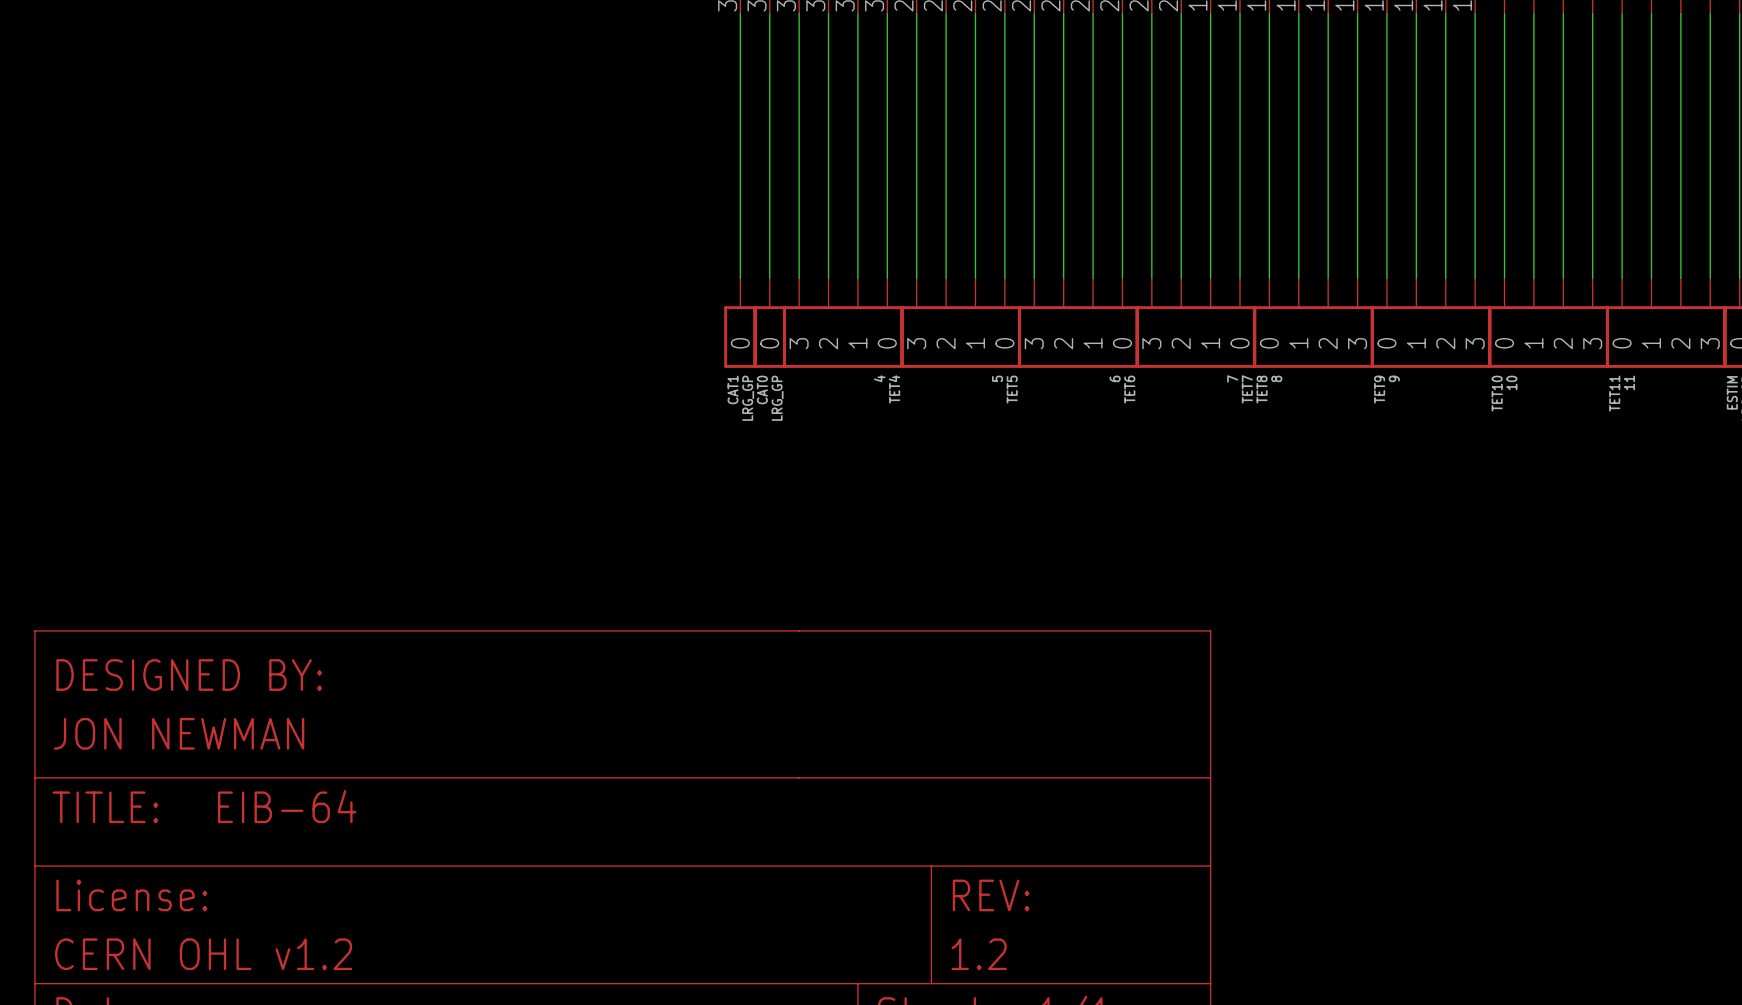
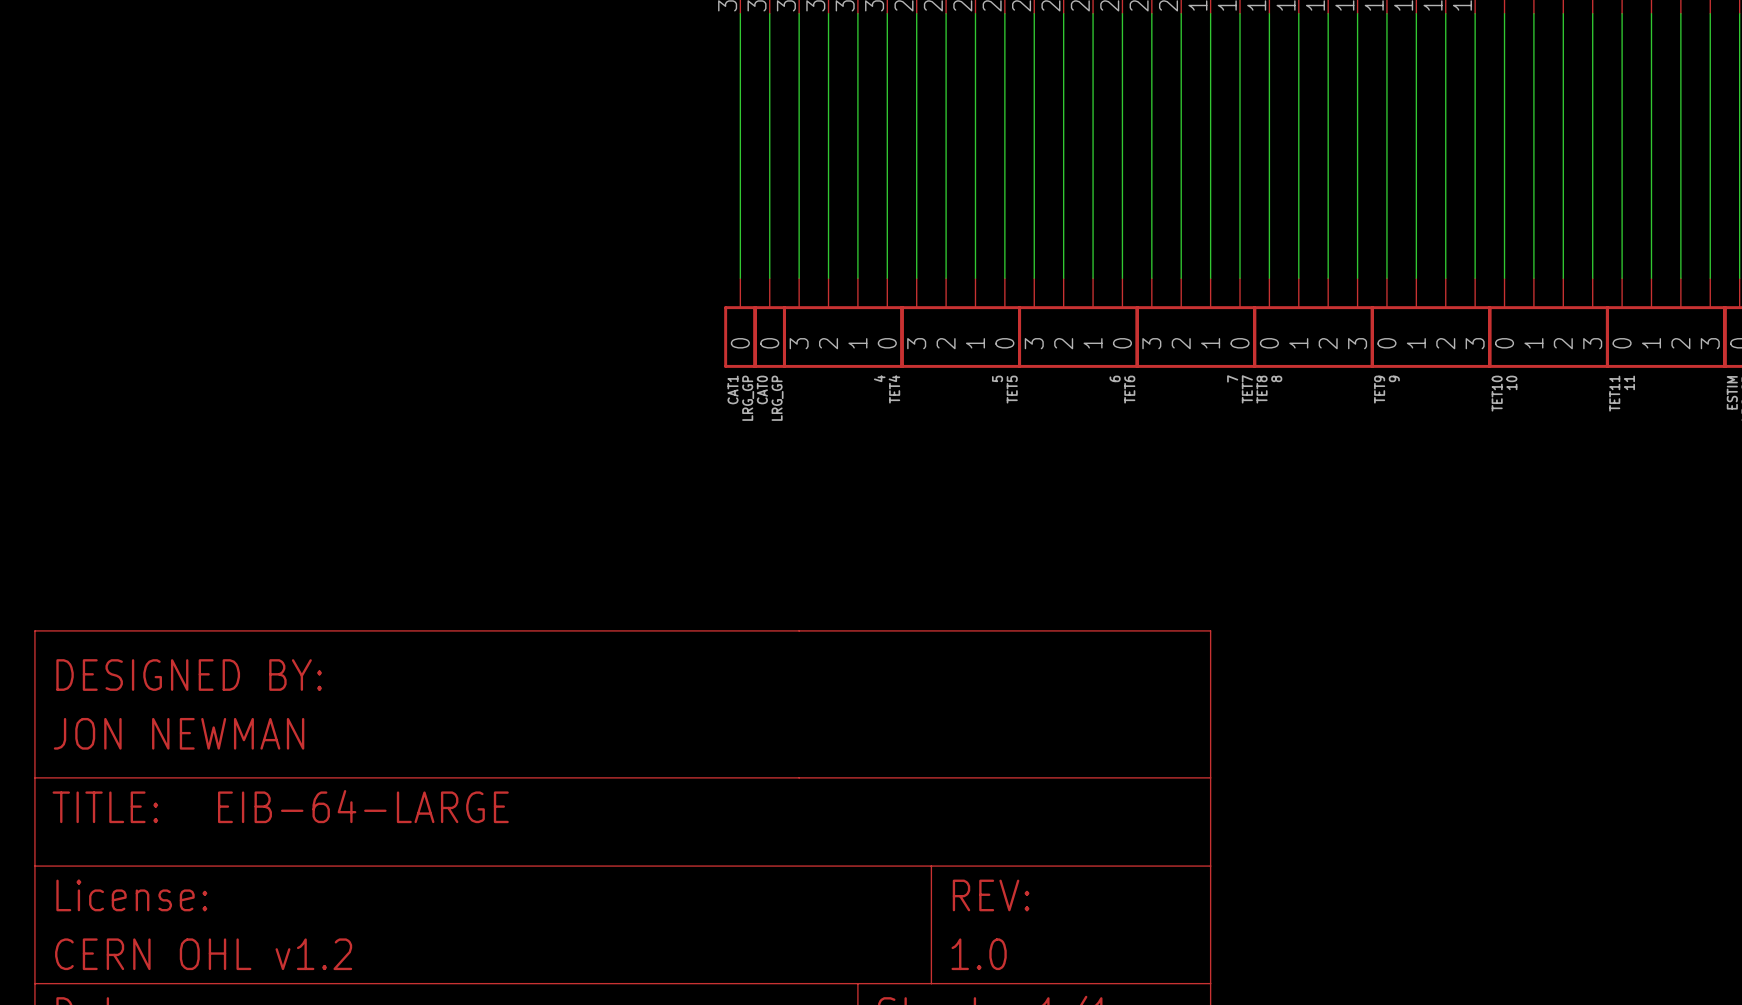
part text: EIB-64 (287, 806) -> EIB-64-LARGE (363, 806)
part text: 1.2 (979, 954) -> 1.0 (979, 954)

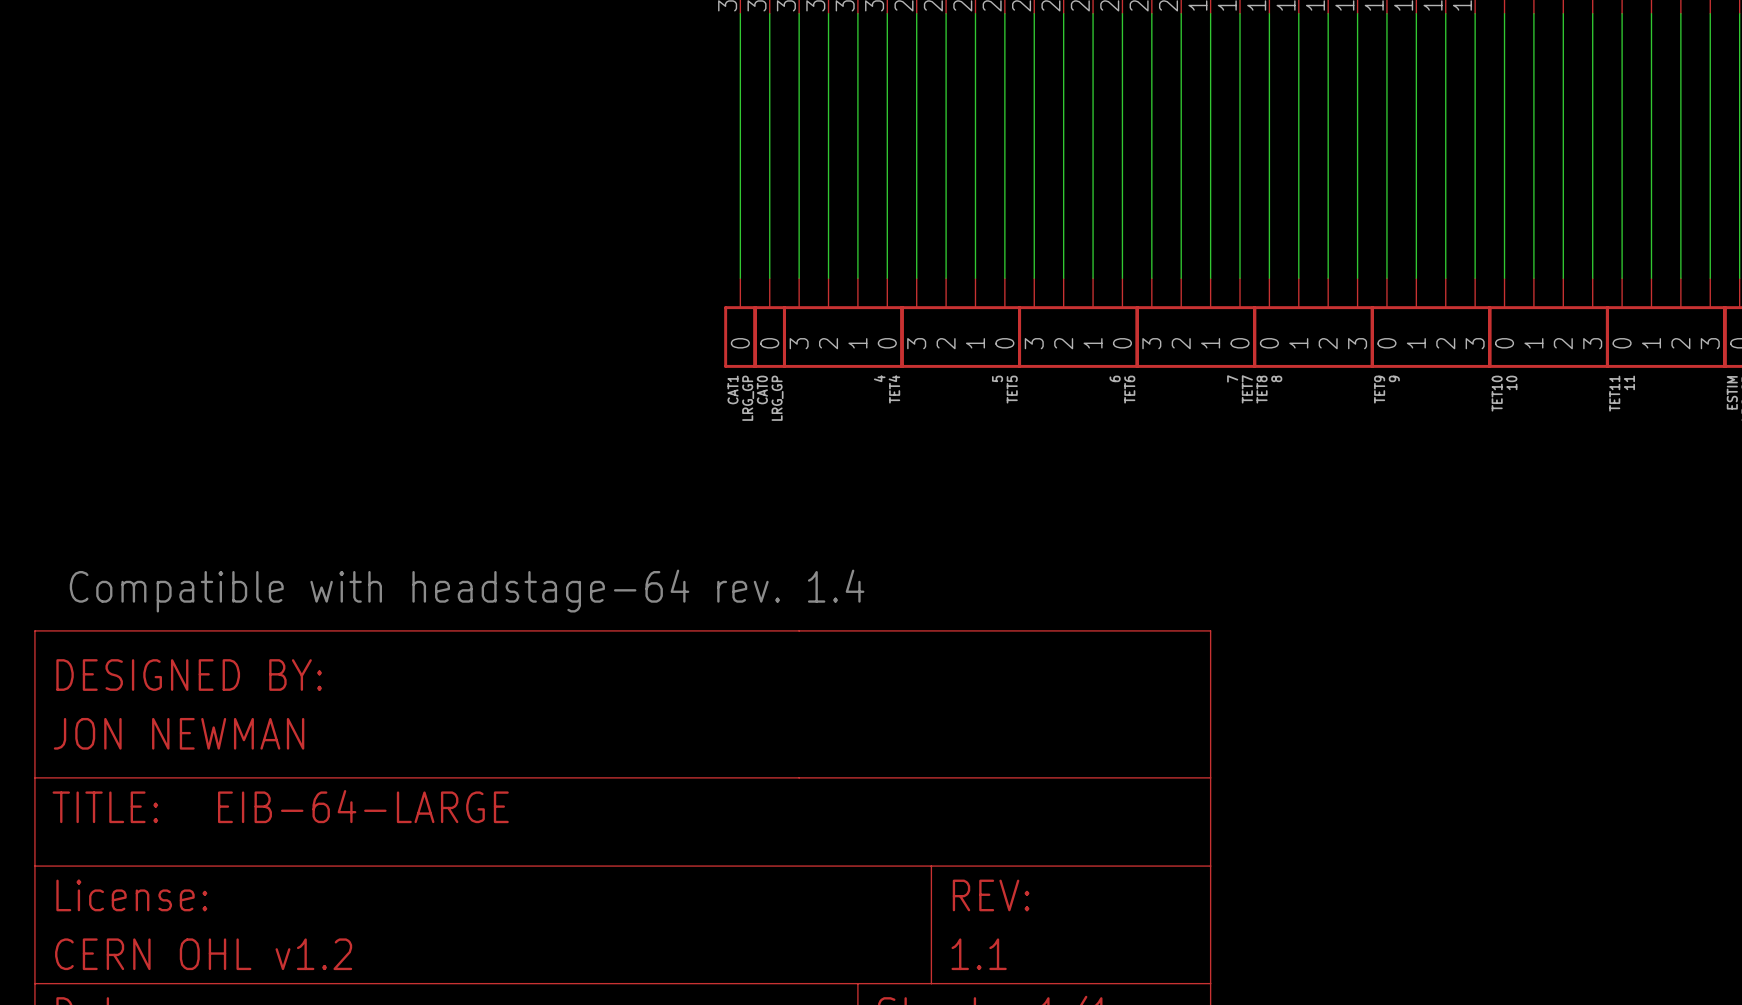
text: none -> Compatible with headstage-64 rev. 1.4 (467, 591)
part text: 1.0 (979, 954) -> 1.1 (979, 954)

